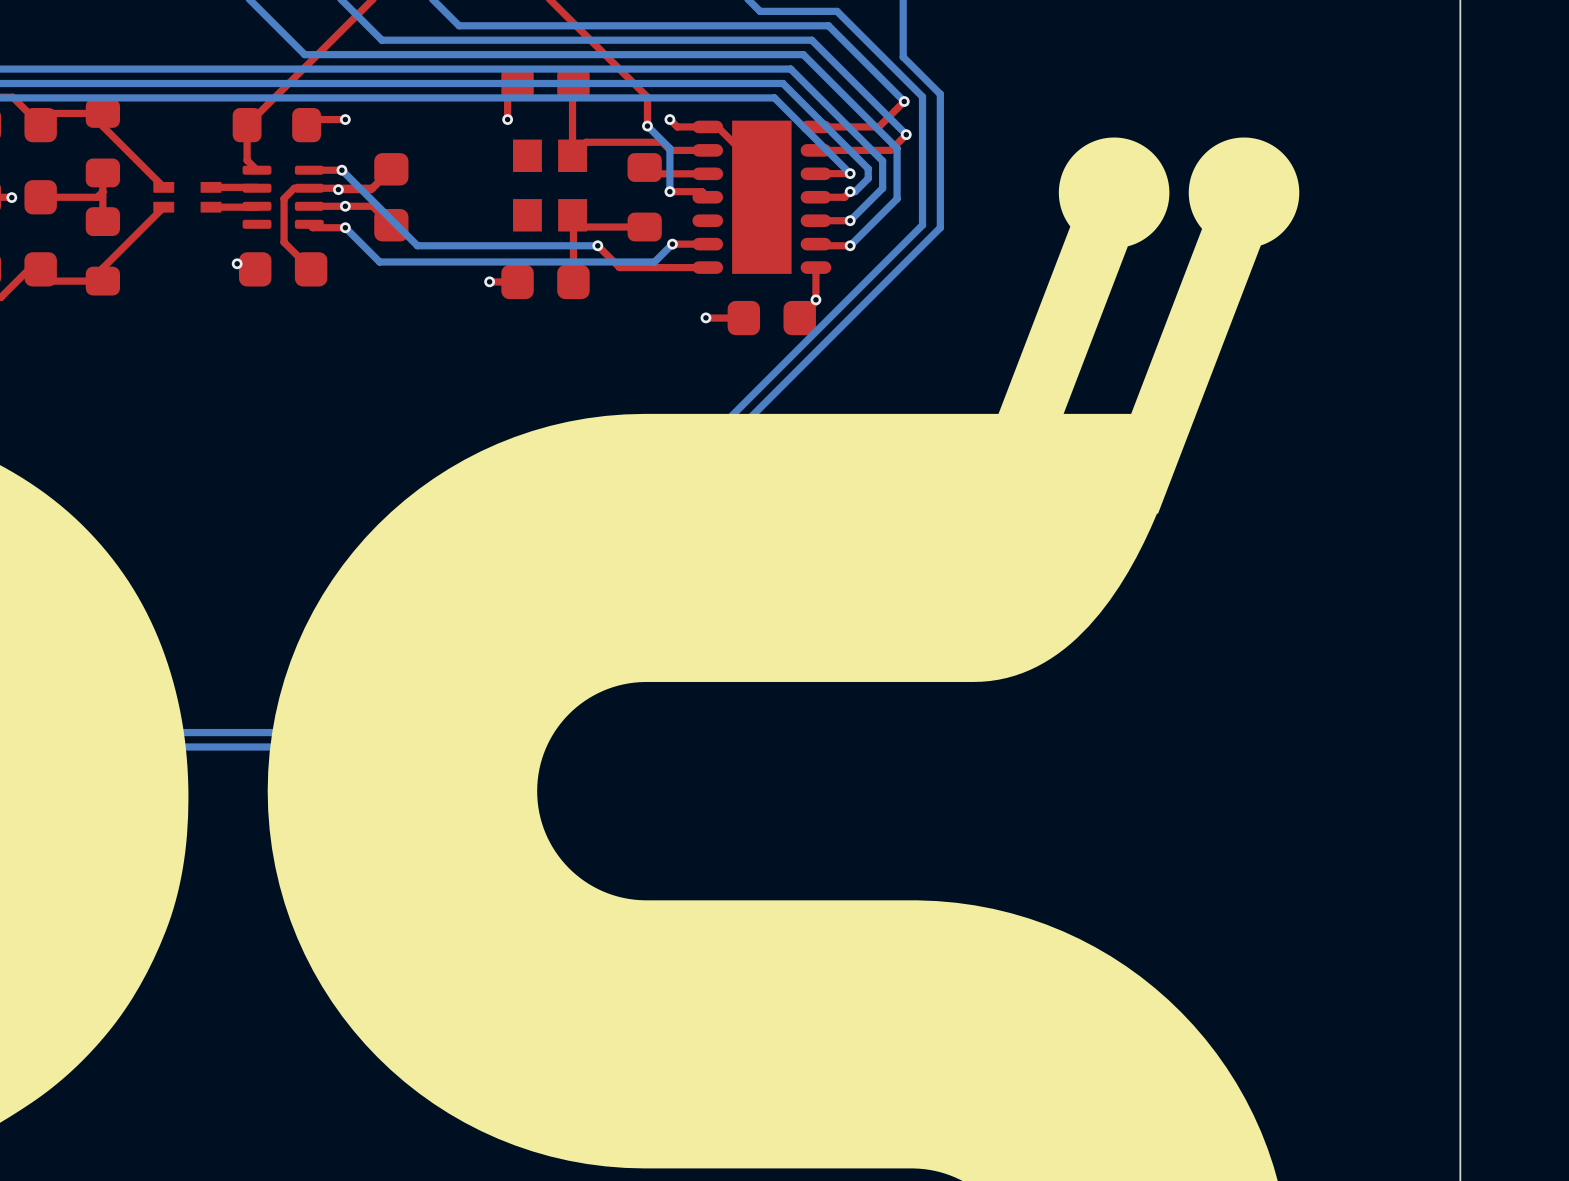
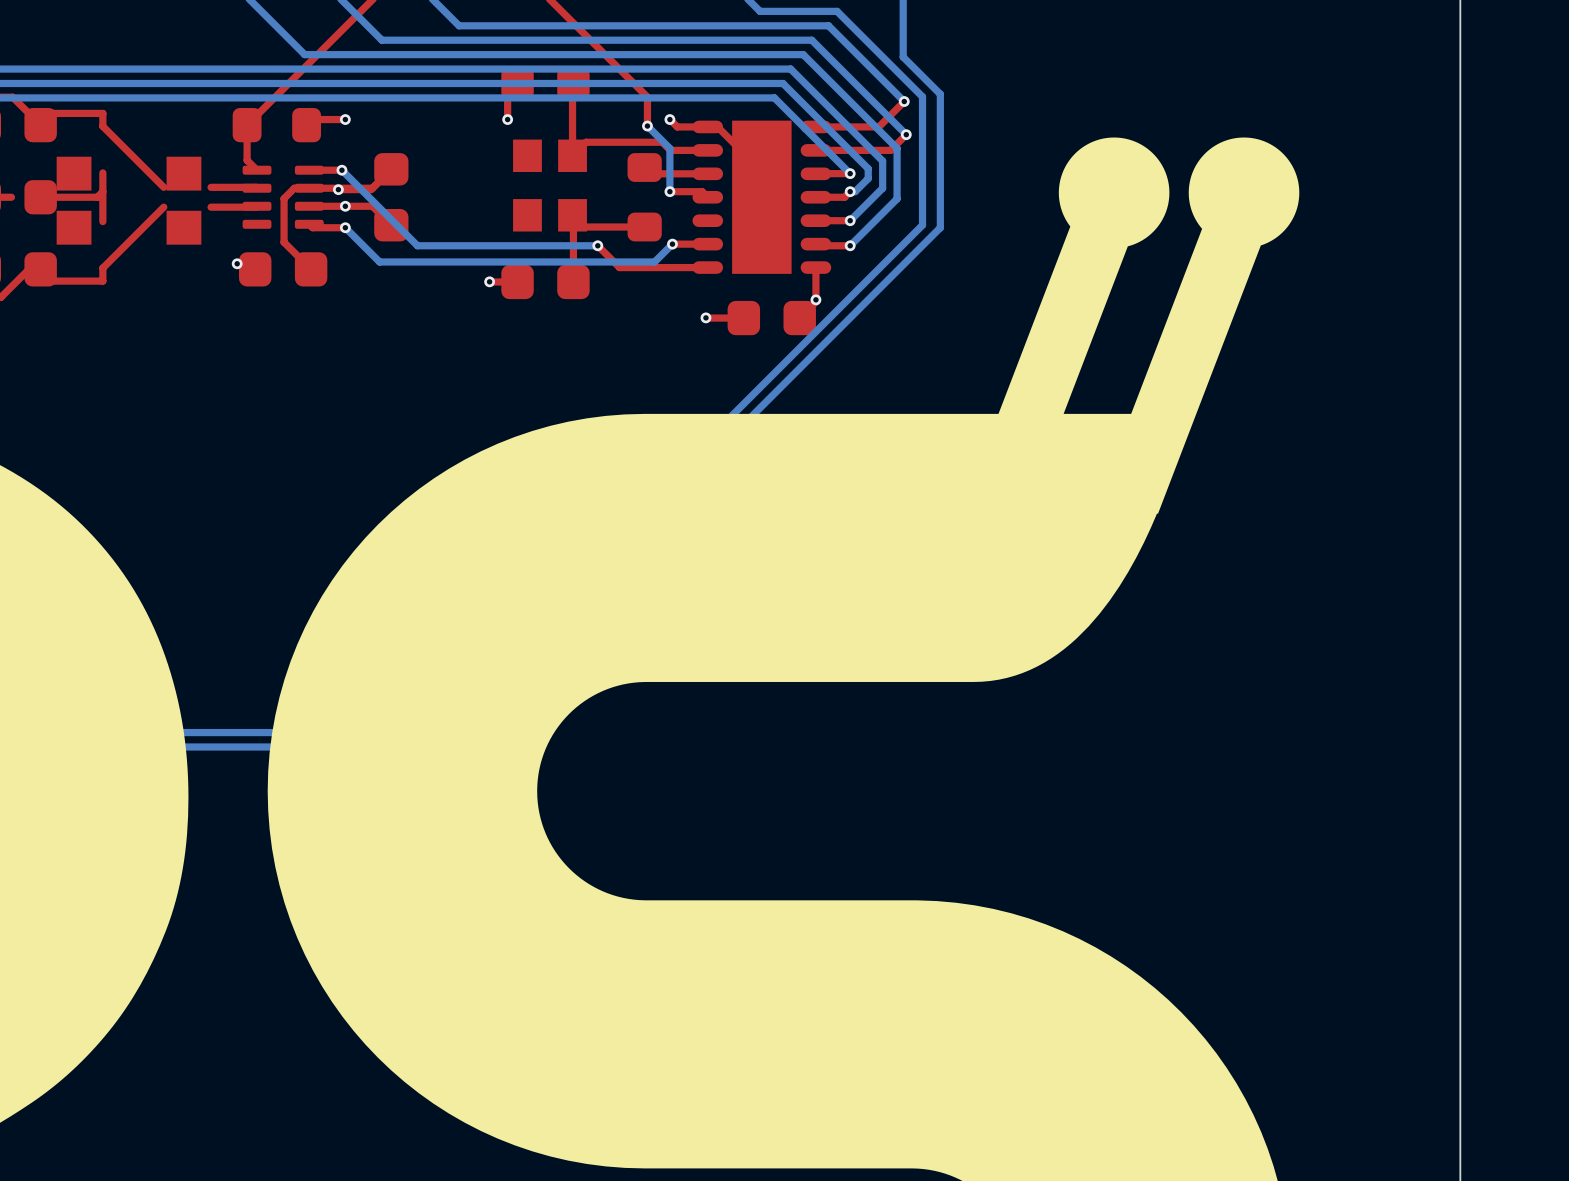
part: (102, 143) -> none
via: (11, 197) -> none
part: (187, 197) -> none
part: none -> (129, 200)
part: (102, 251) -> none

